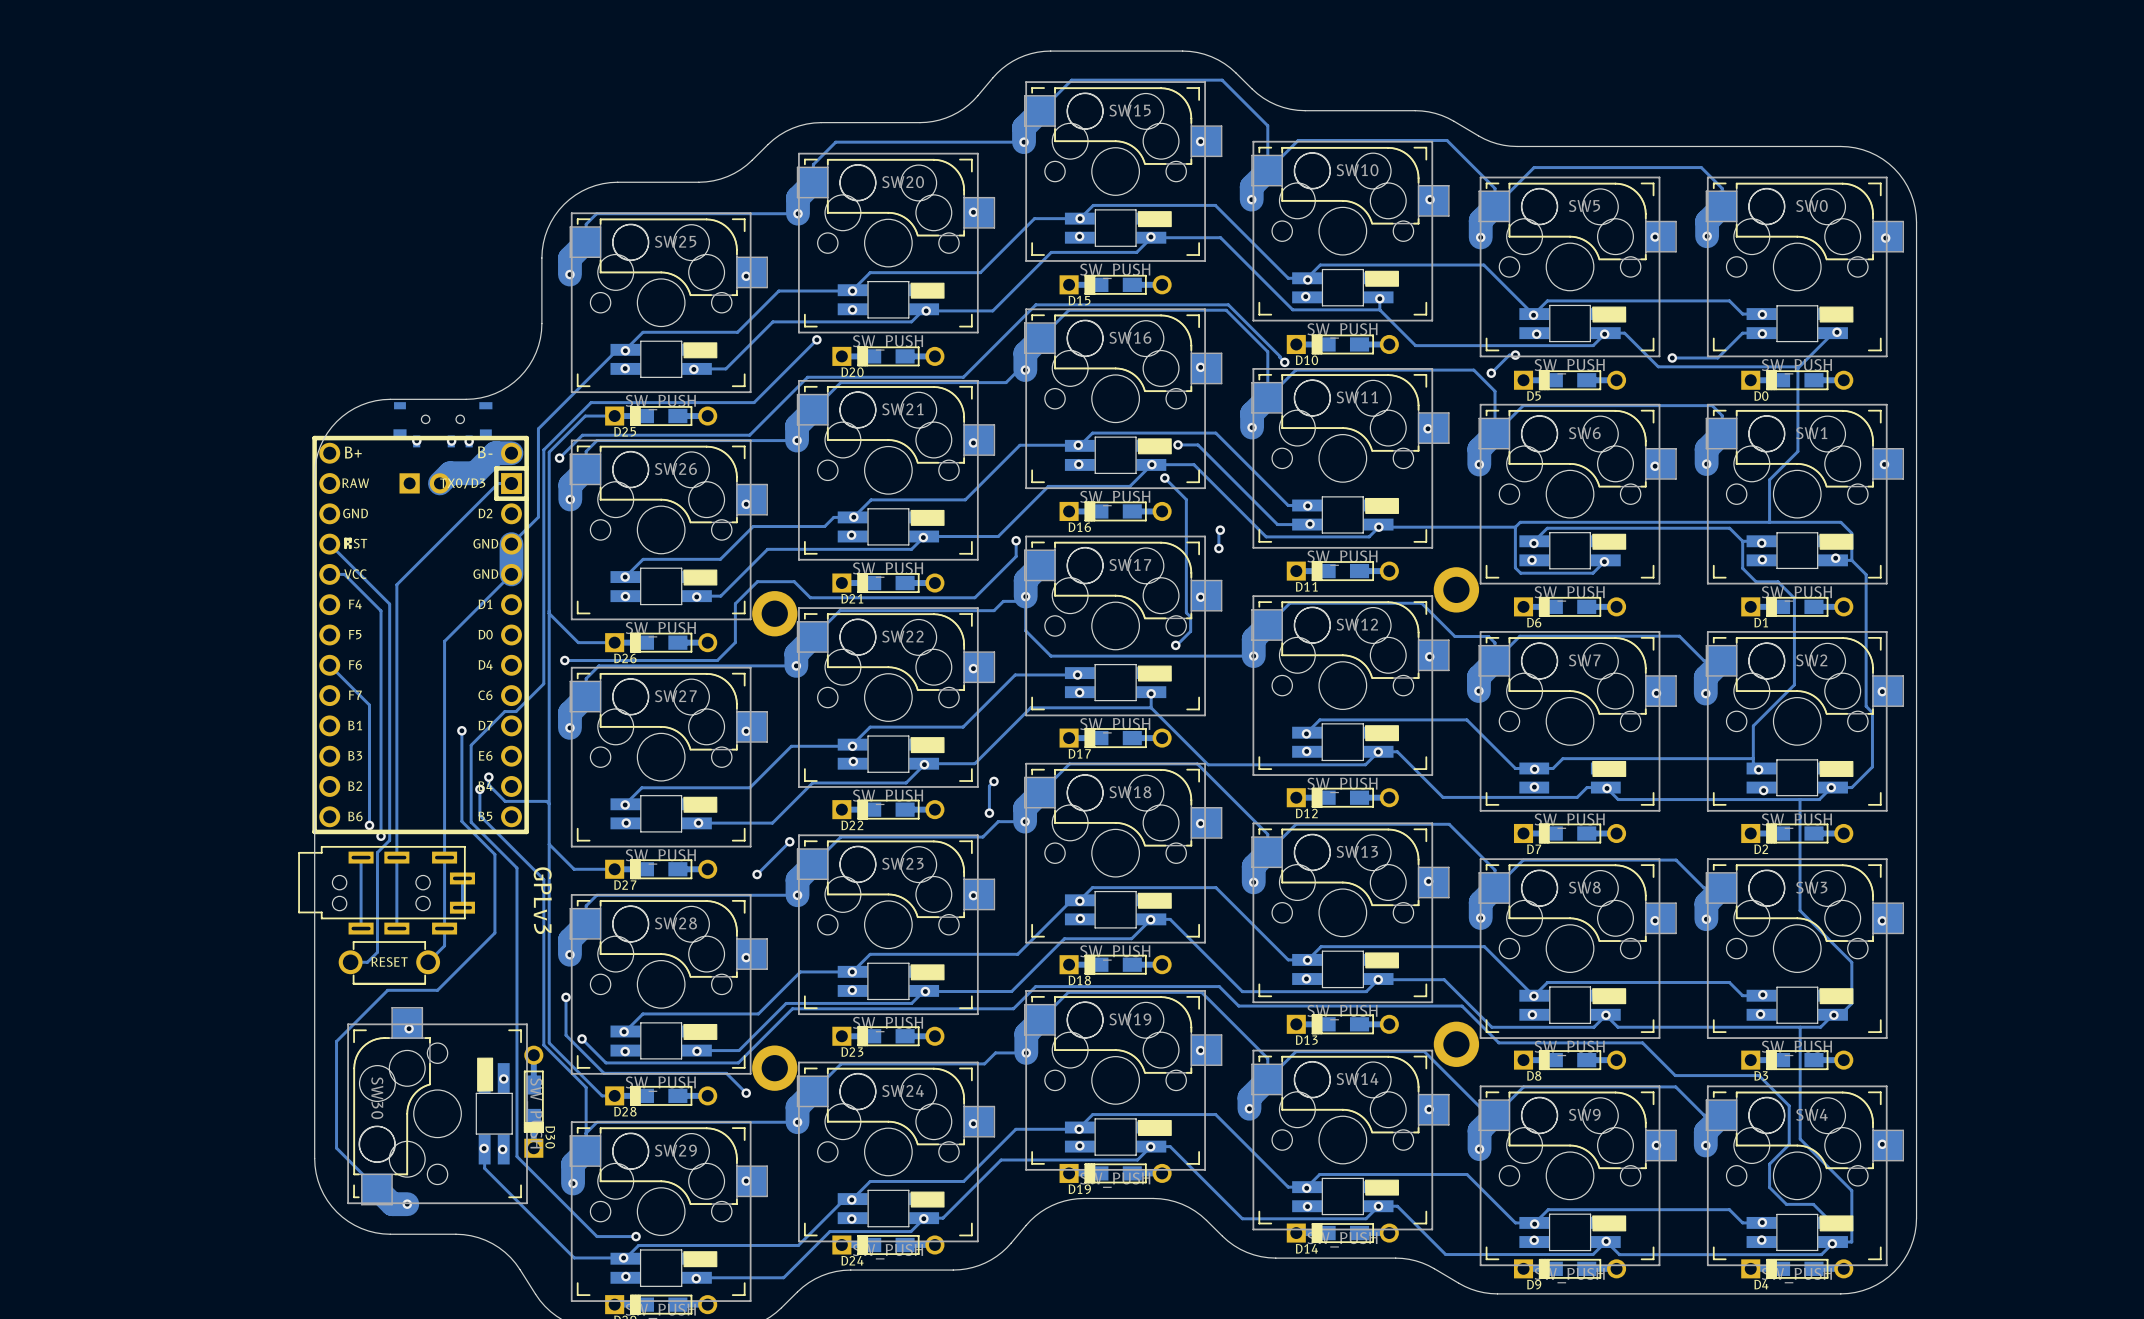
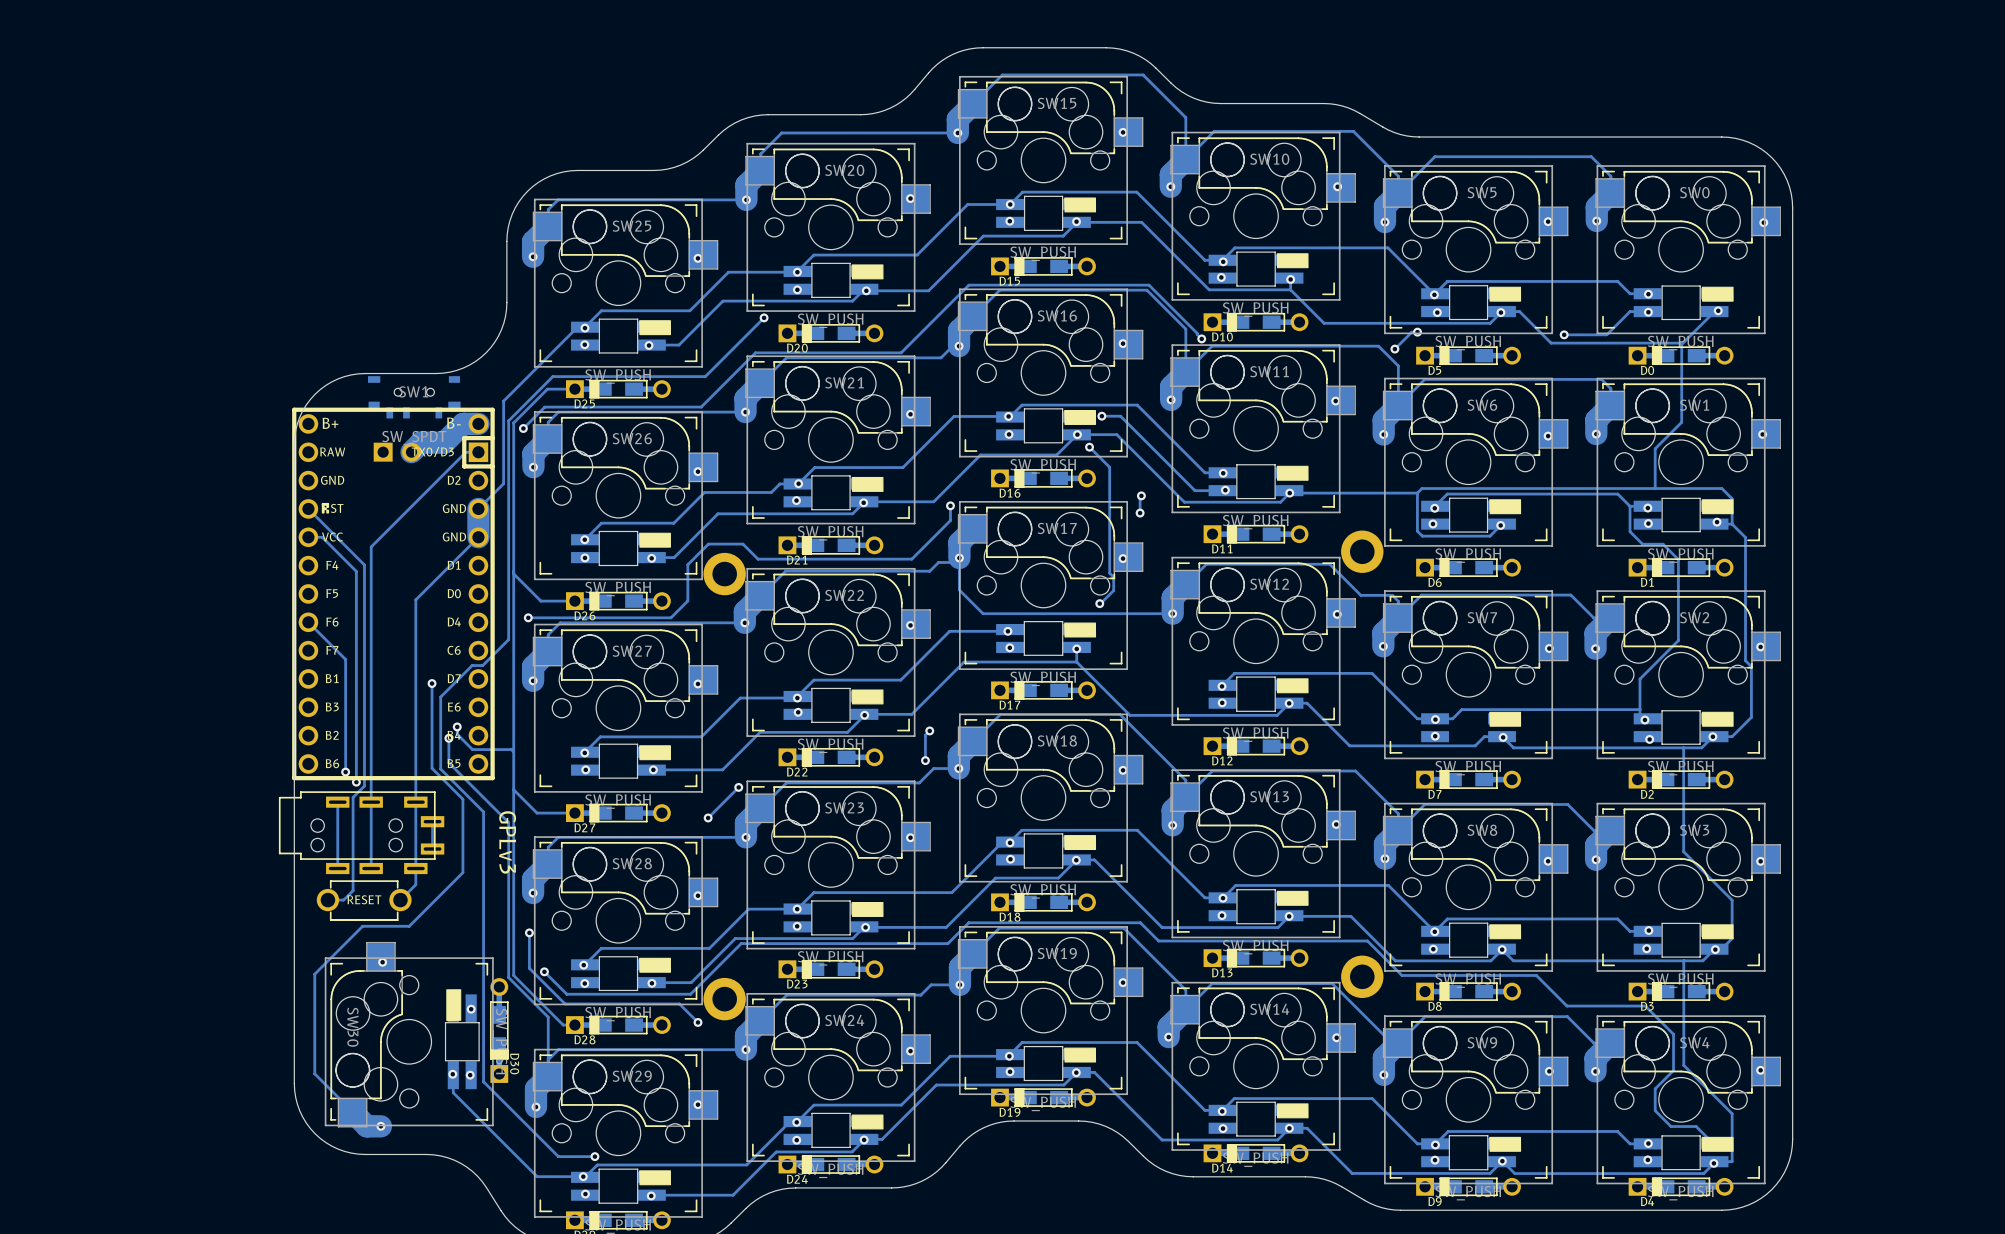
SW1 side: top (442, 424) -> bottom (414, 397)
via: (416, 440) -> none
via: (451, 441) -> none
via: (469, 441) -> none

